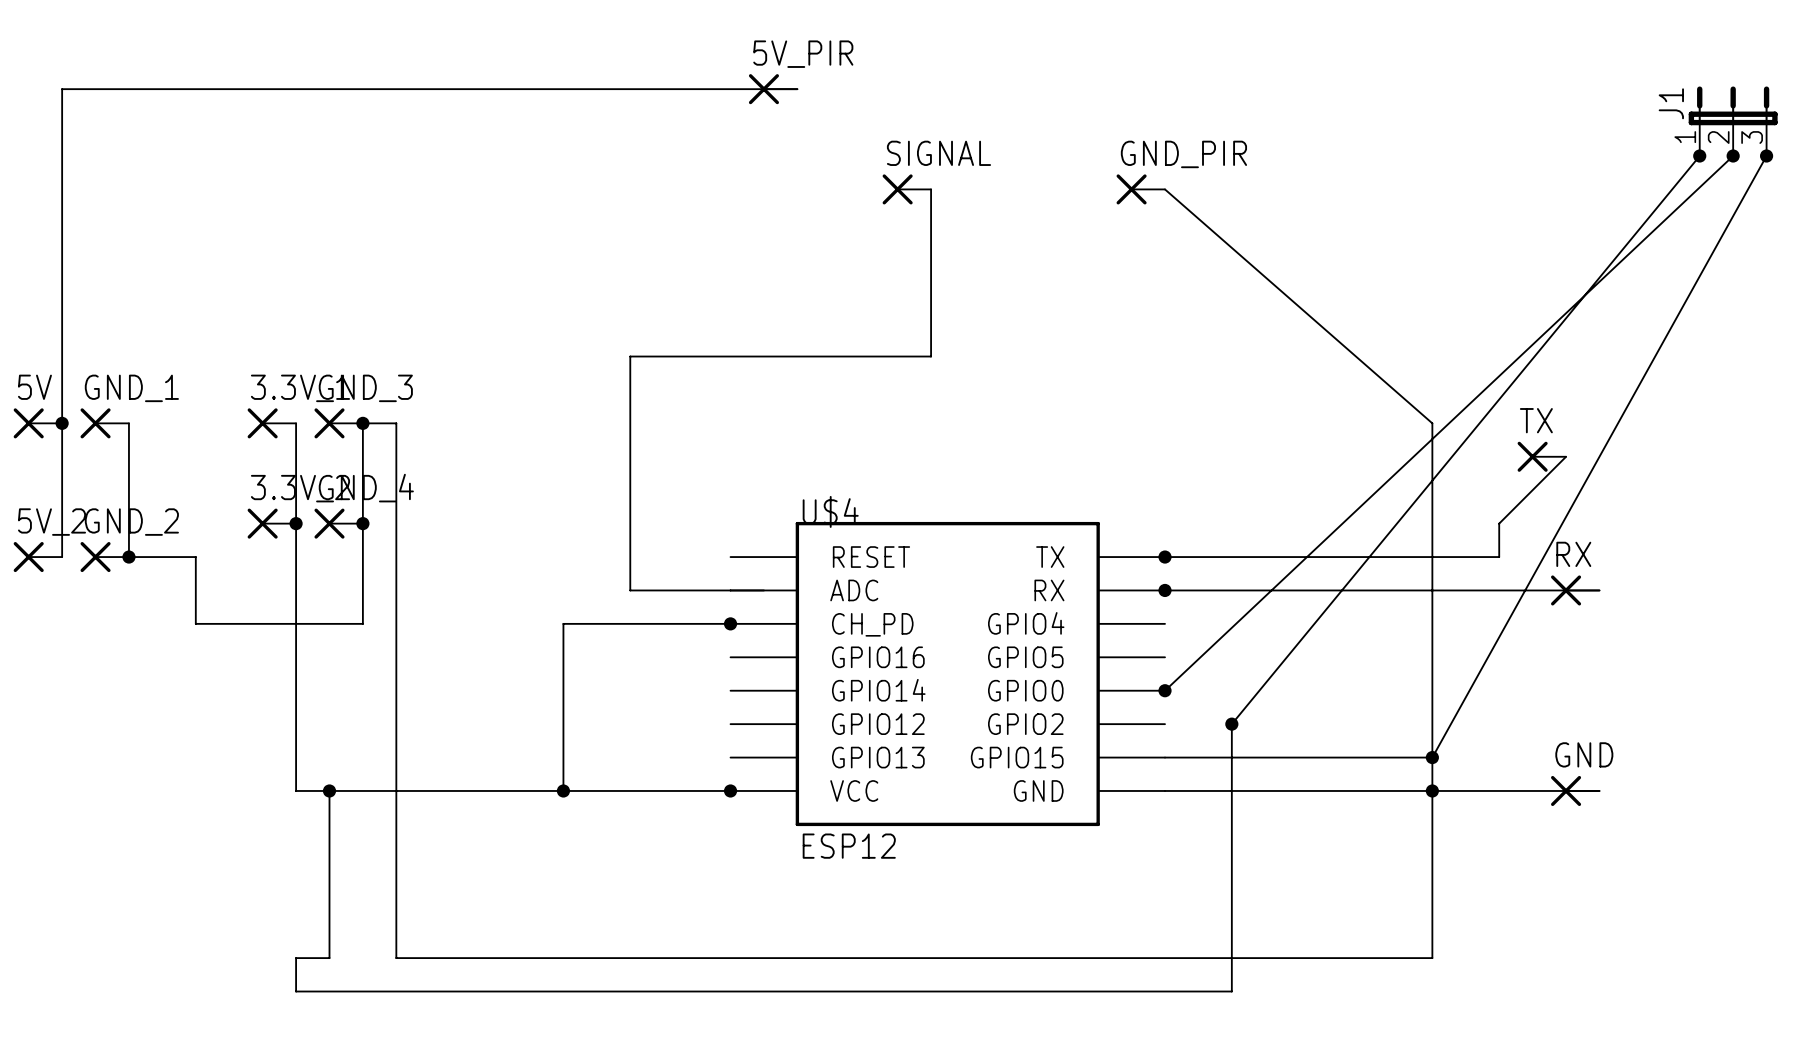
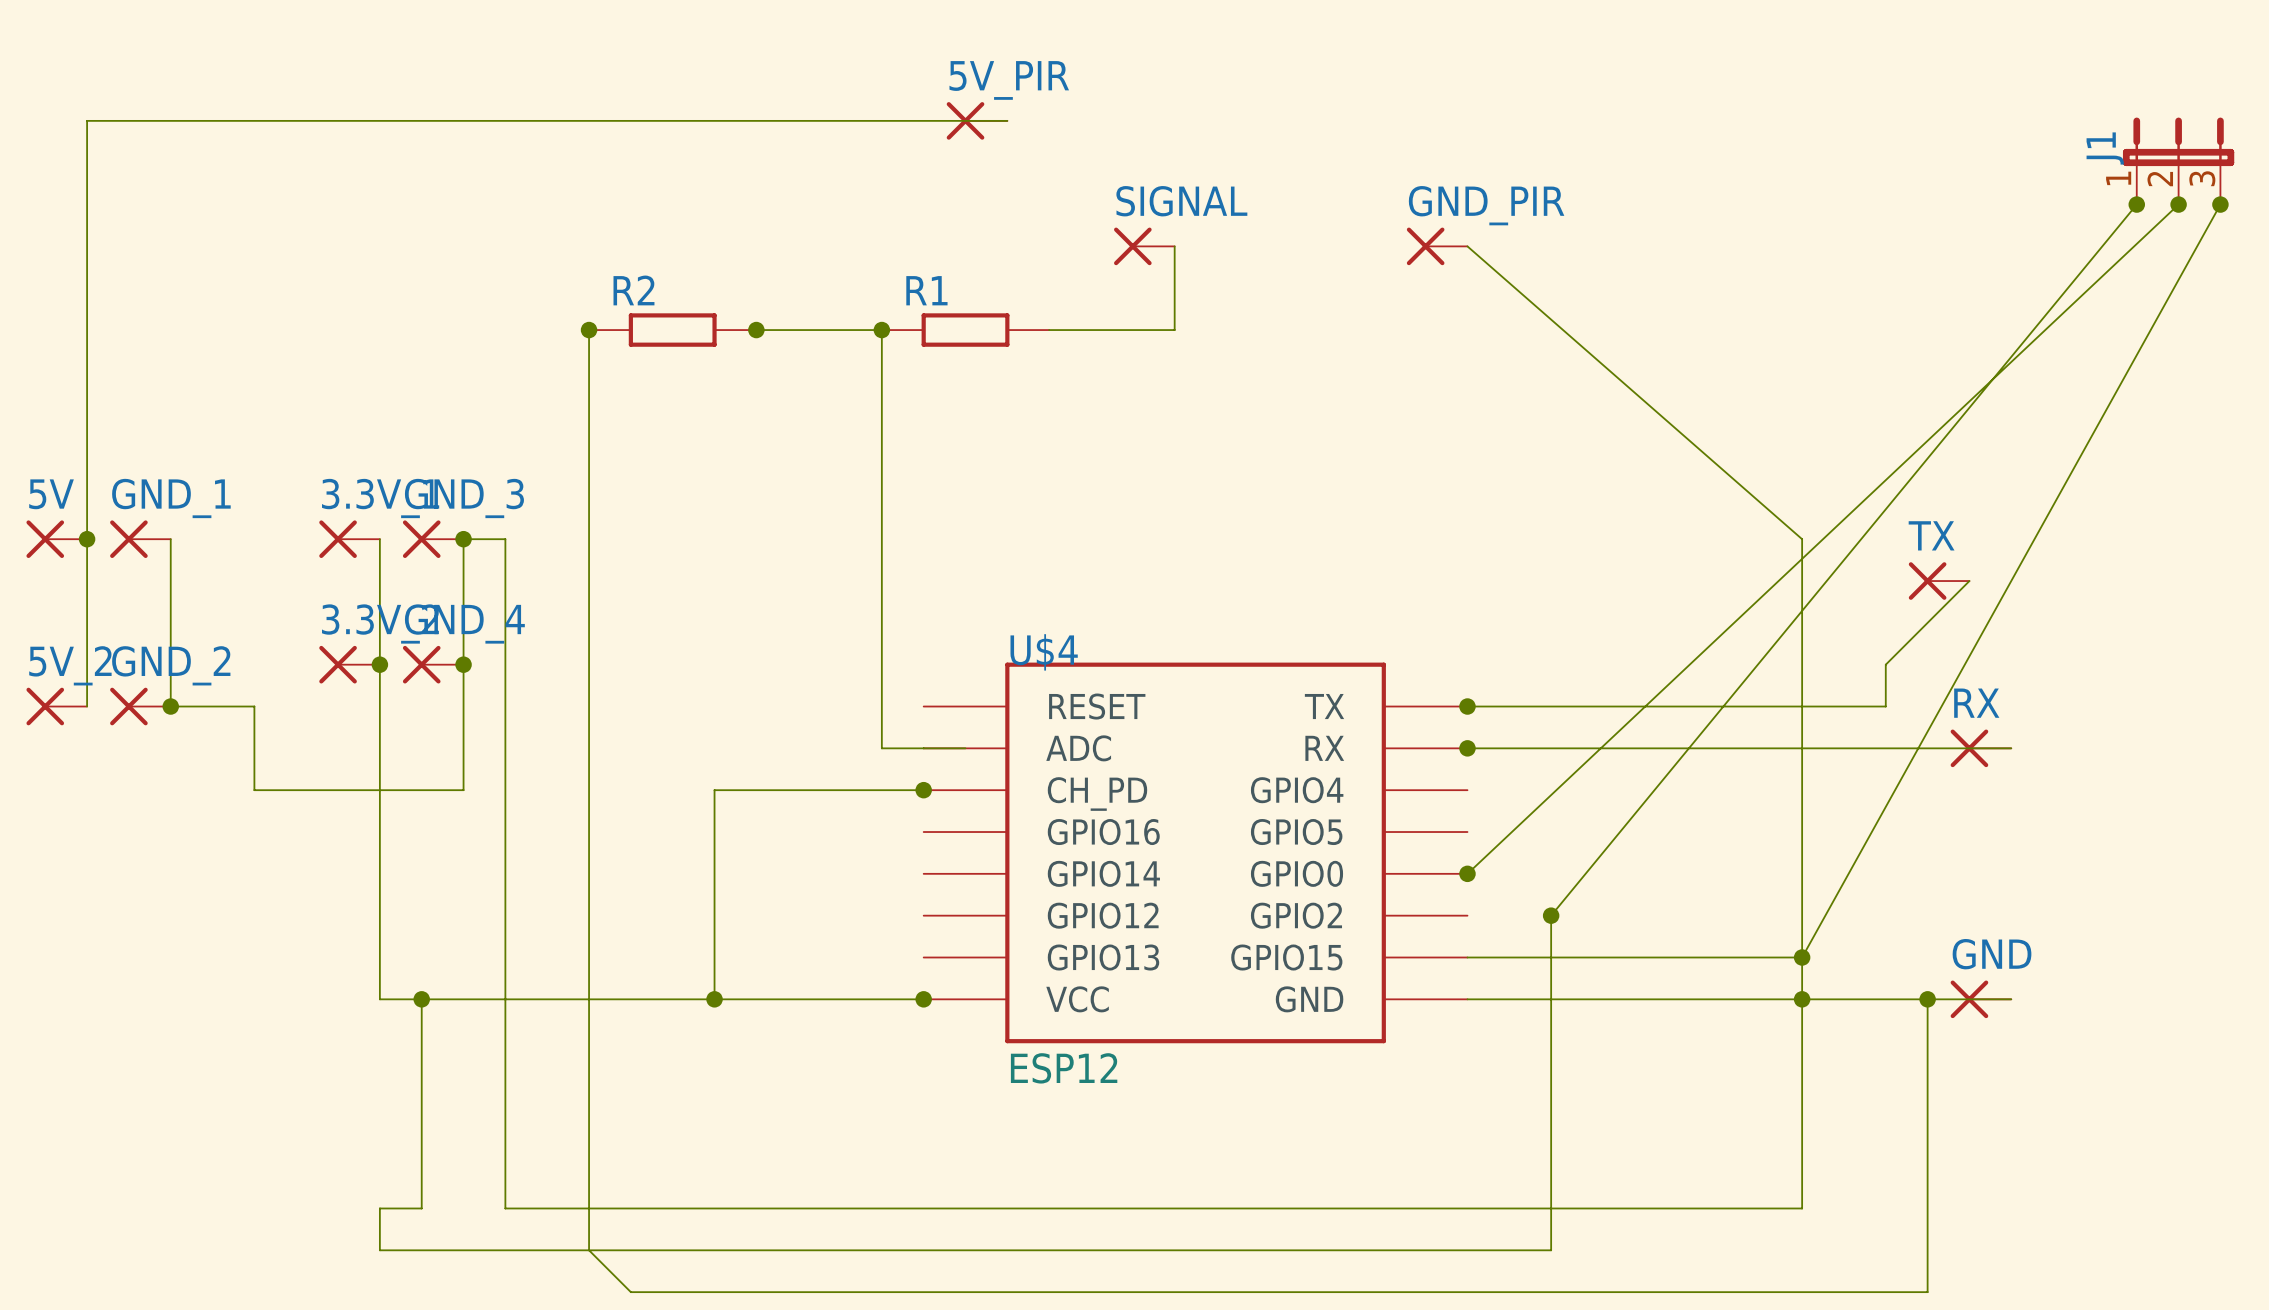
wire: none -> (589, 330) (589, 1250) (630, 1292) (1927, 1292) (1927, 999)
junction: none -> (589, 330)
R2: none -> (672, 330)
junction: none -> (756, 330)
junction: none -> (881, 330)
R1: none -> (965, 330)
wire: none -> (1049, 330) (1174, 330)
wire: (931, 256) (931, 356) (630, 356) (630, 590) (697, 590) -> (756, 330) (881, 330) (881, 748)
junction: none -> (1927, 999)

